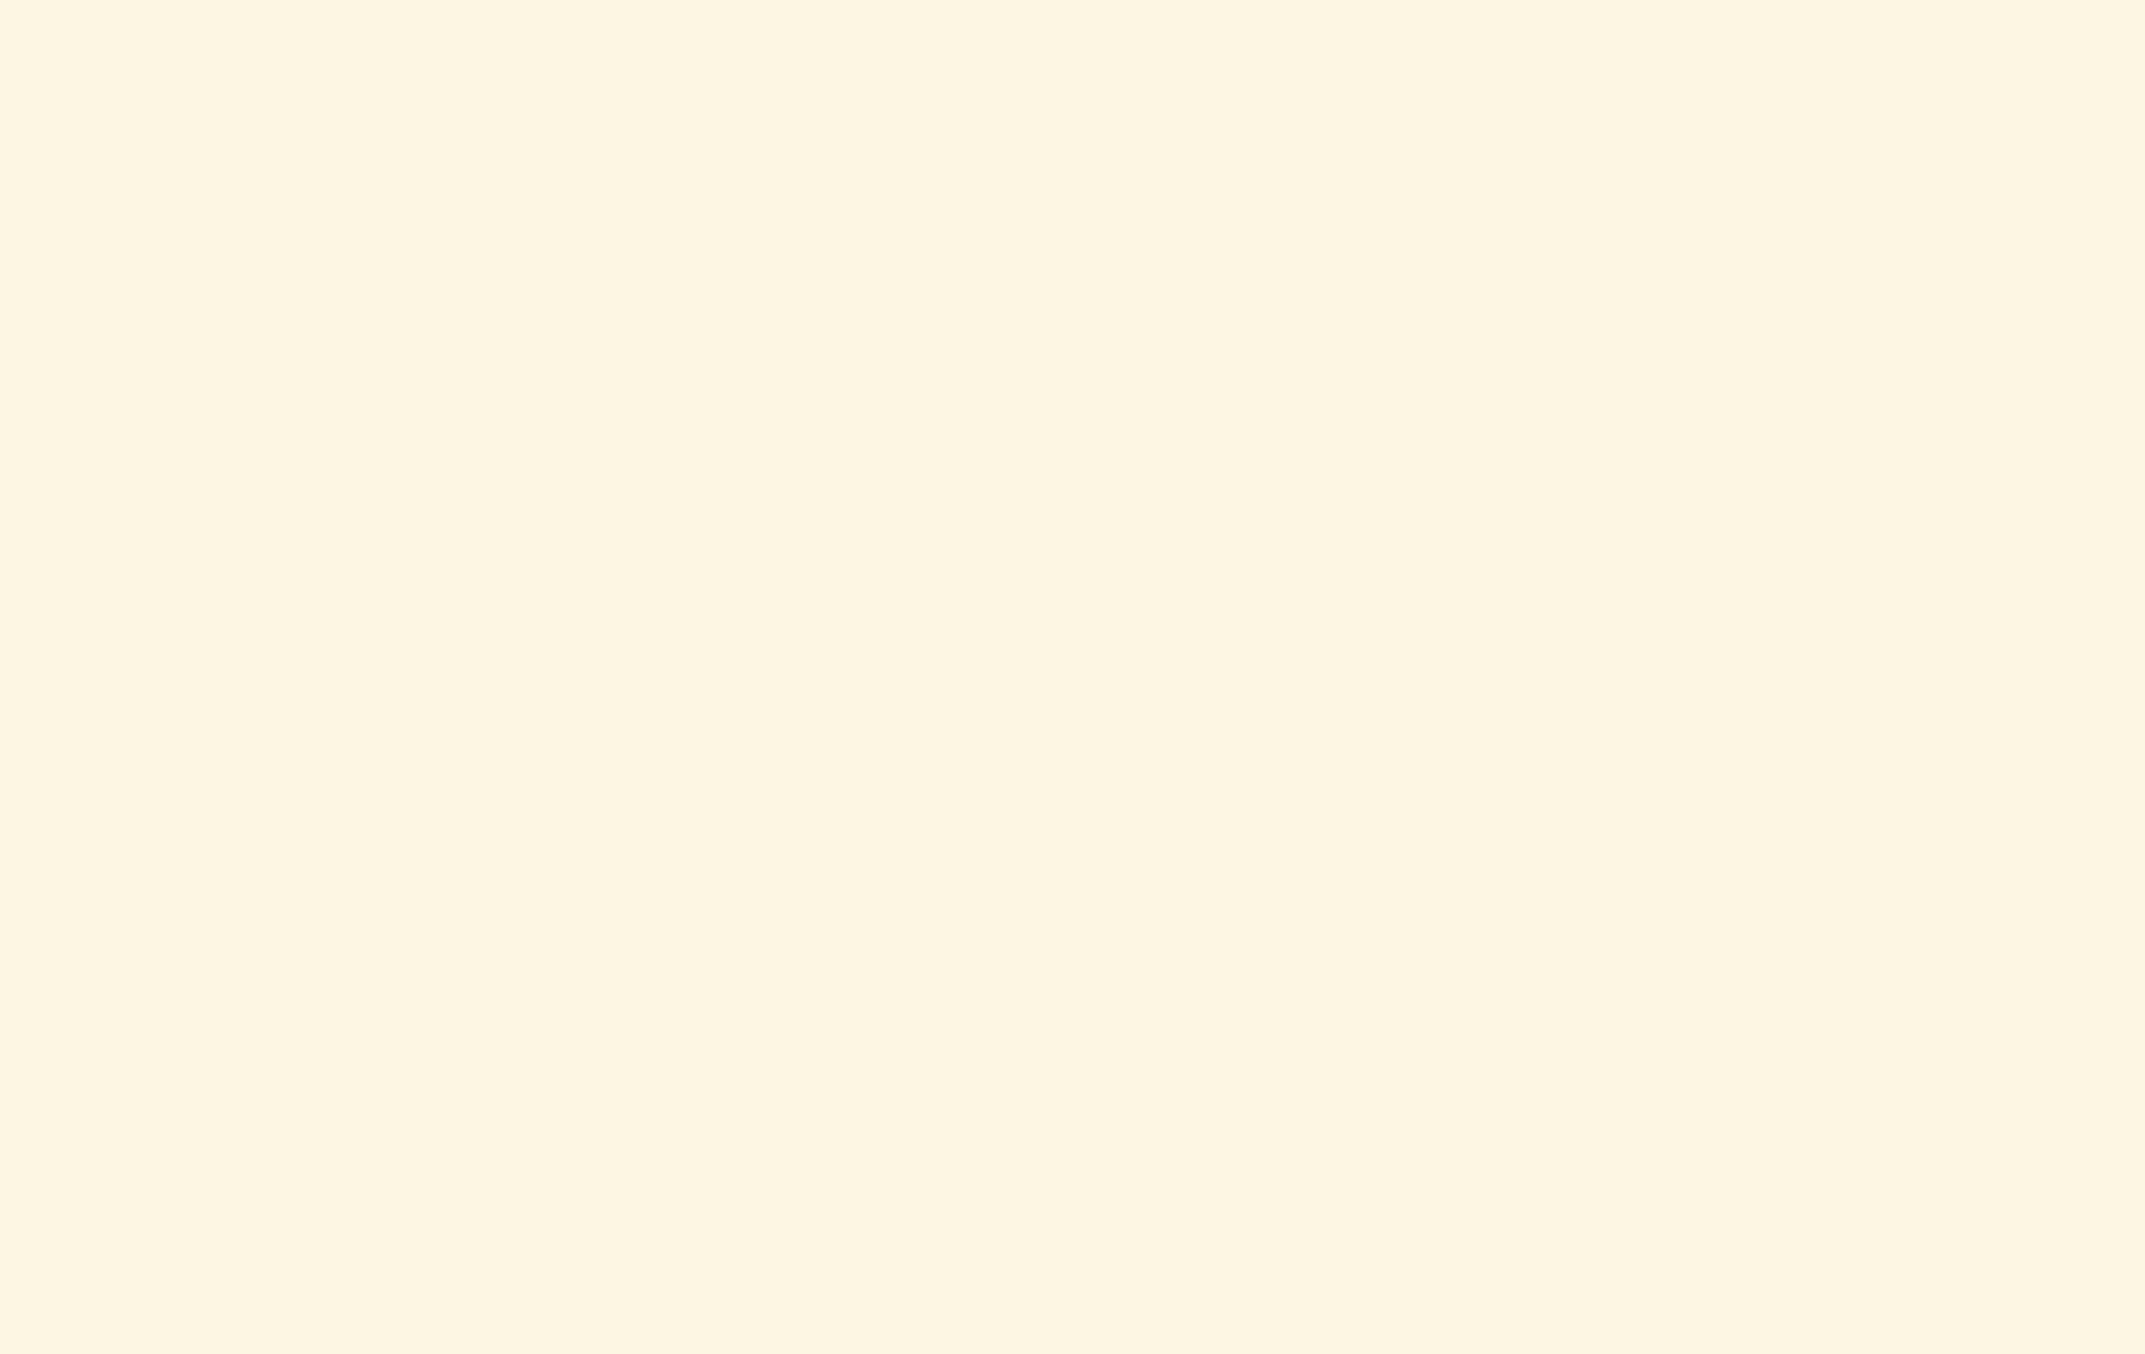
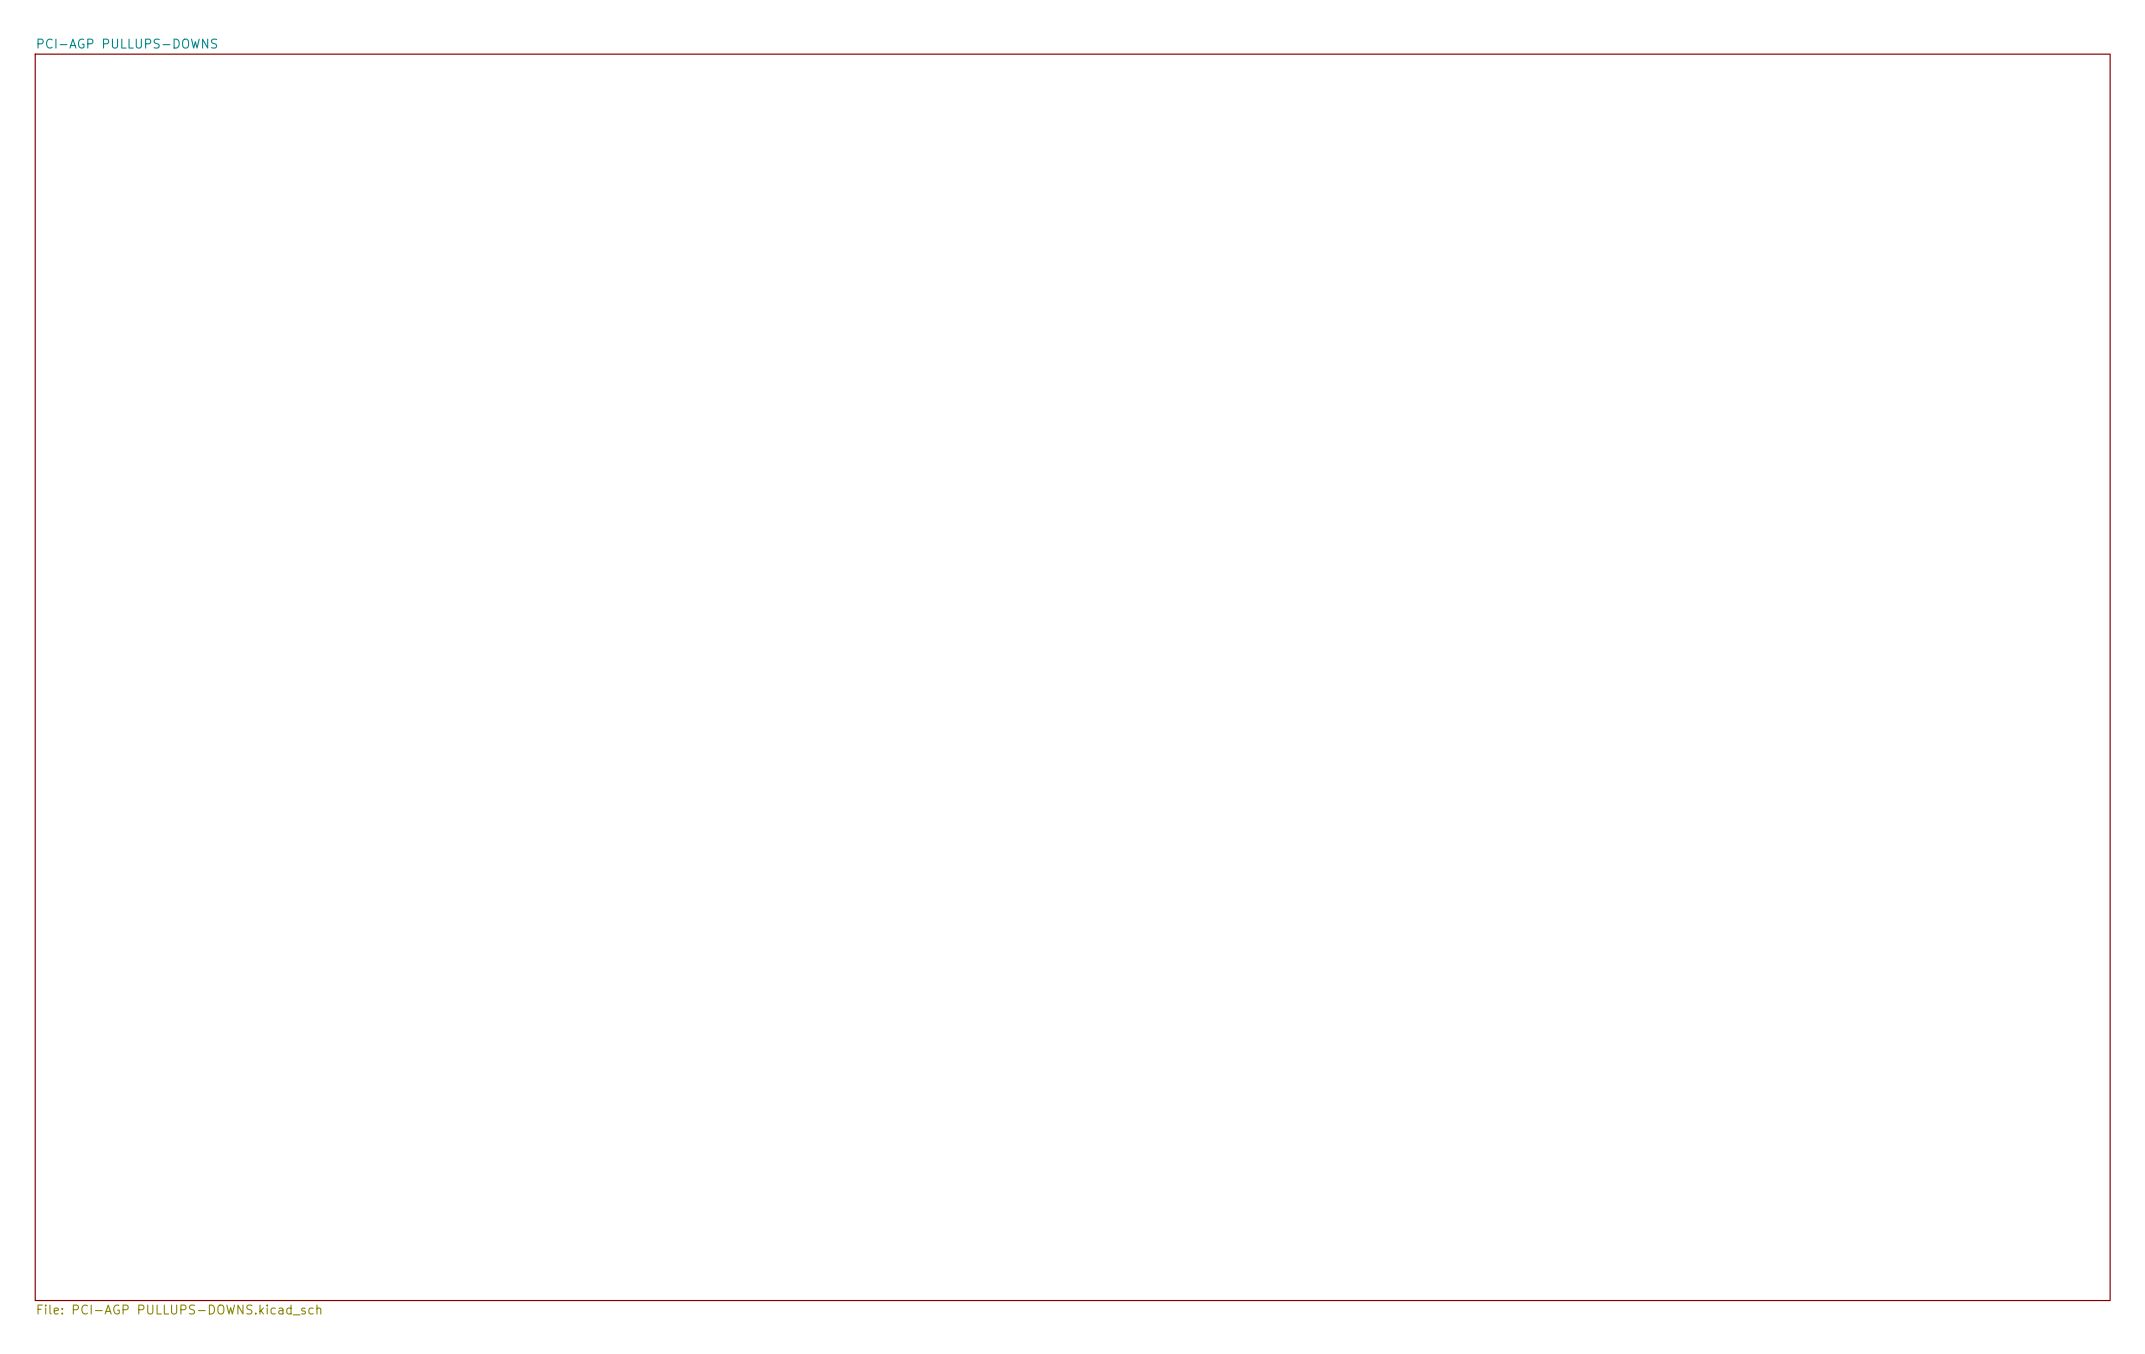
sheet PCI-AGP PULLUPS-DOWNS: none -> File: PCI-AGP PULLUPS-DOWNS.kicad_sch (1072, 677)

